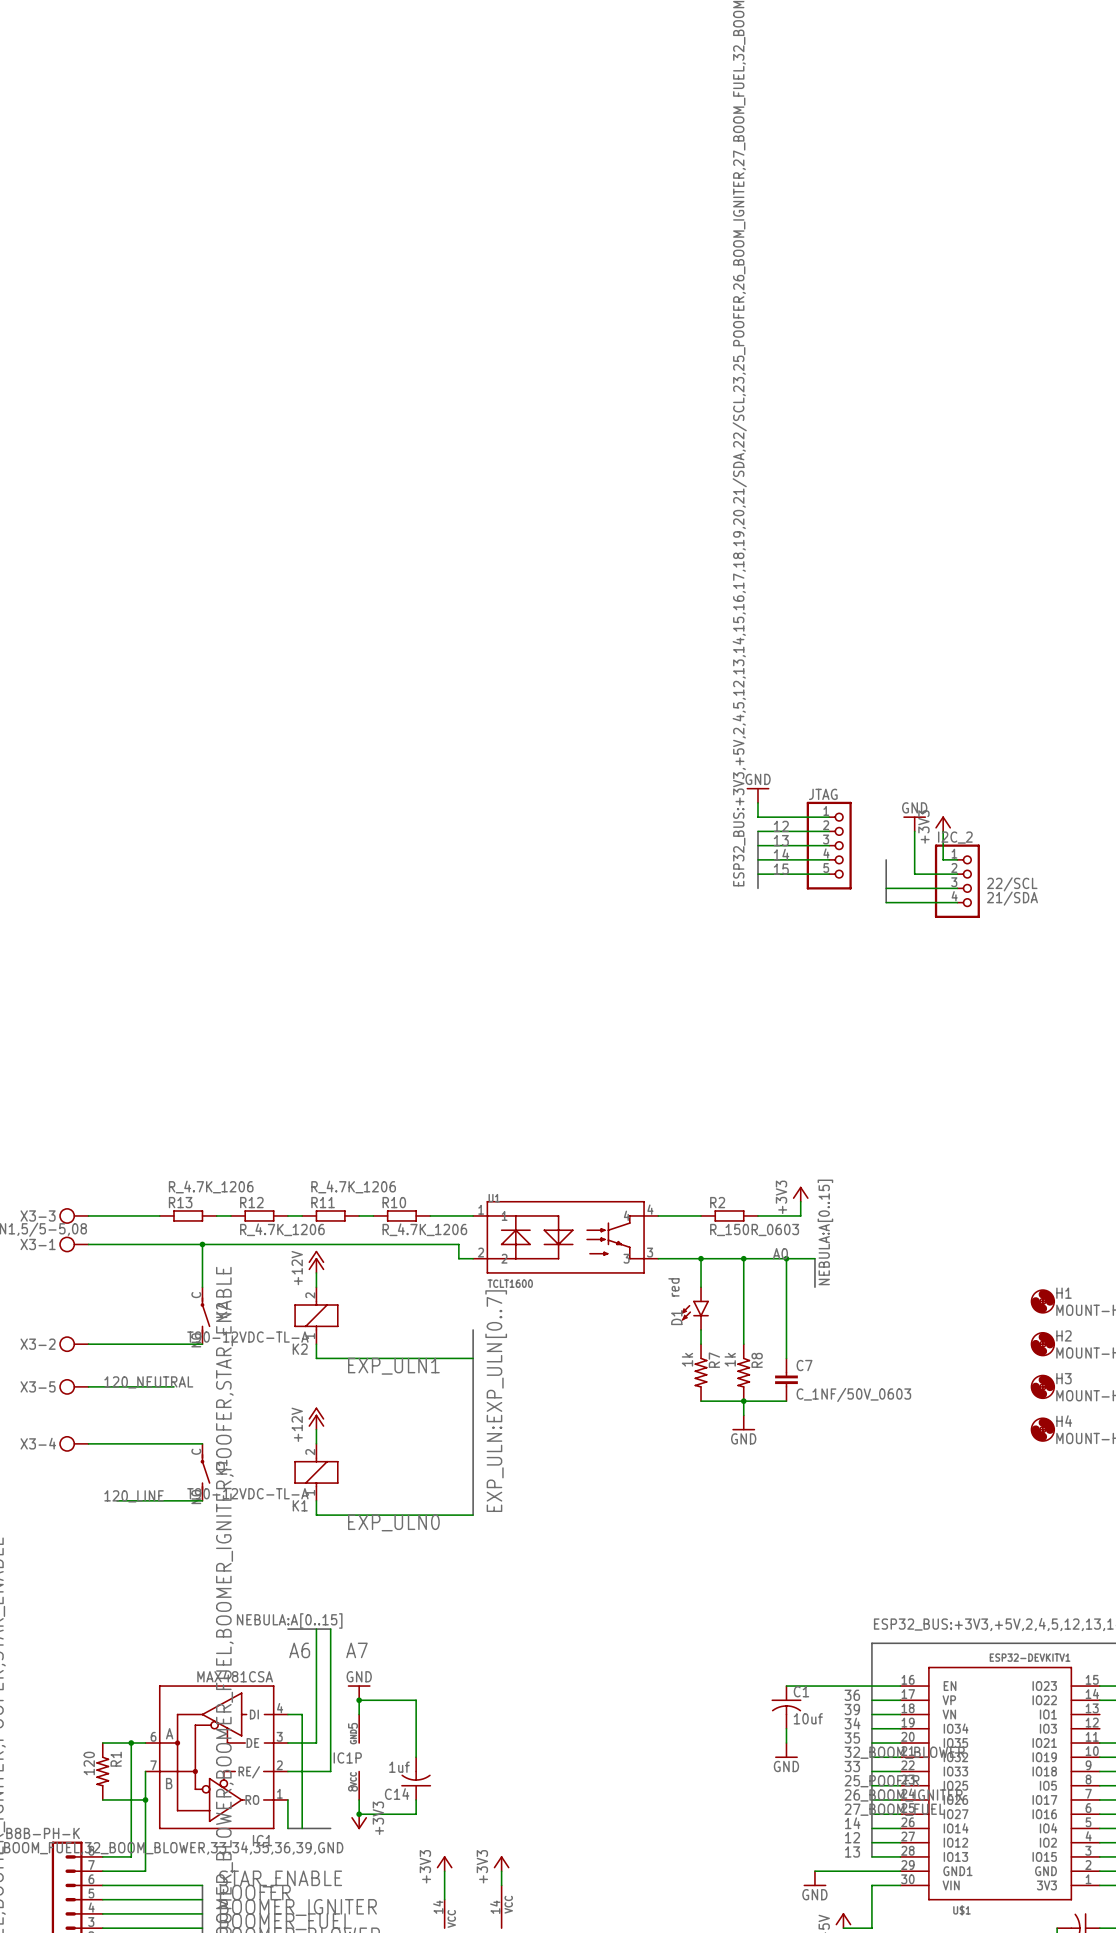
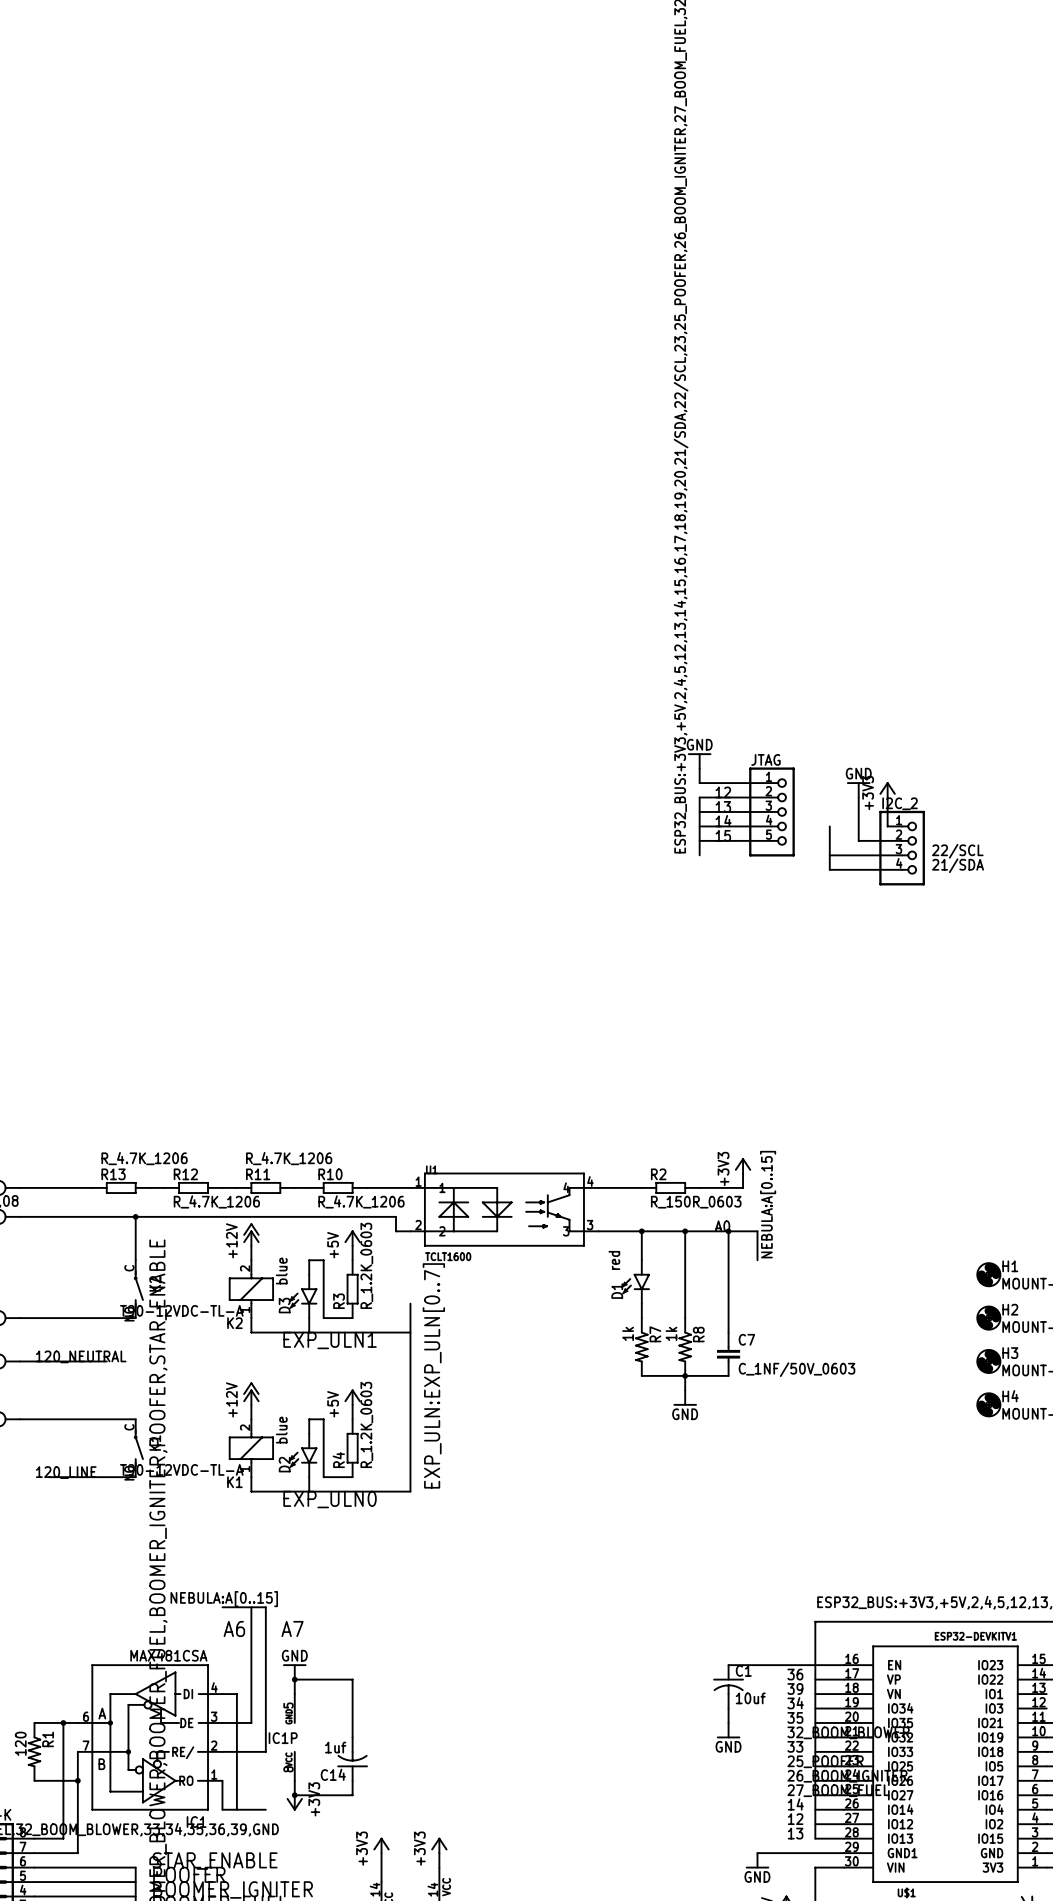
power symbol: none -> +5V (352, 1238)
wire: none -> (352, 1245) (352, 1260)
wire: none -> (309, 1274) (309, 1260) (323, 1260) (323, 1318) (352, 1318)
R3: none -> R_1.2K_0603 (352, 1289)
D3: none -> blue (303, 1296)
wire: none -> (309, 1318) (309, 1332)
power symbol: none -> +5V (352, 1397)
wire: none -> (352, 1404) (352, 1419)
wire: none -> (309, 1433) (309, 1419) (323, 1419) (323, 1477) (352, 1477)
R4: none -> R_1.2K_0603 (352, 1448)
D2: none -> blue (303, 1455)
wire: none -> (309, 1477) (309, 1491)

